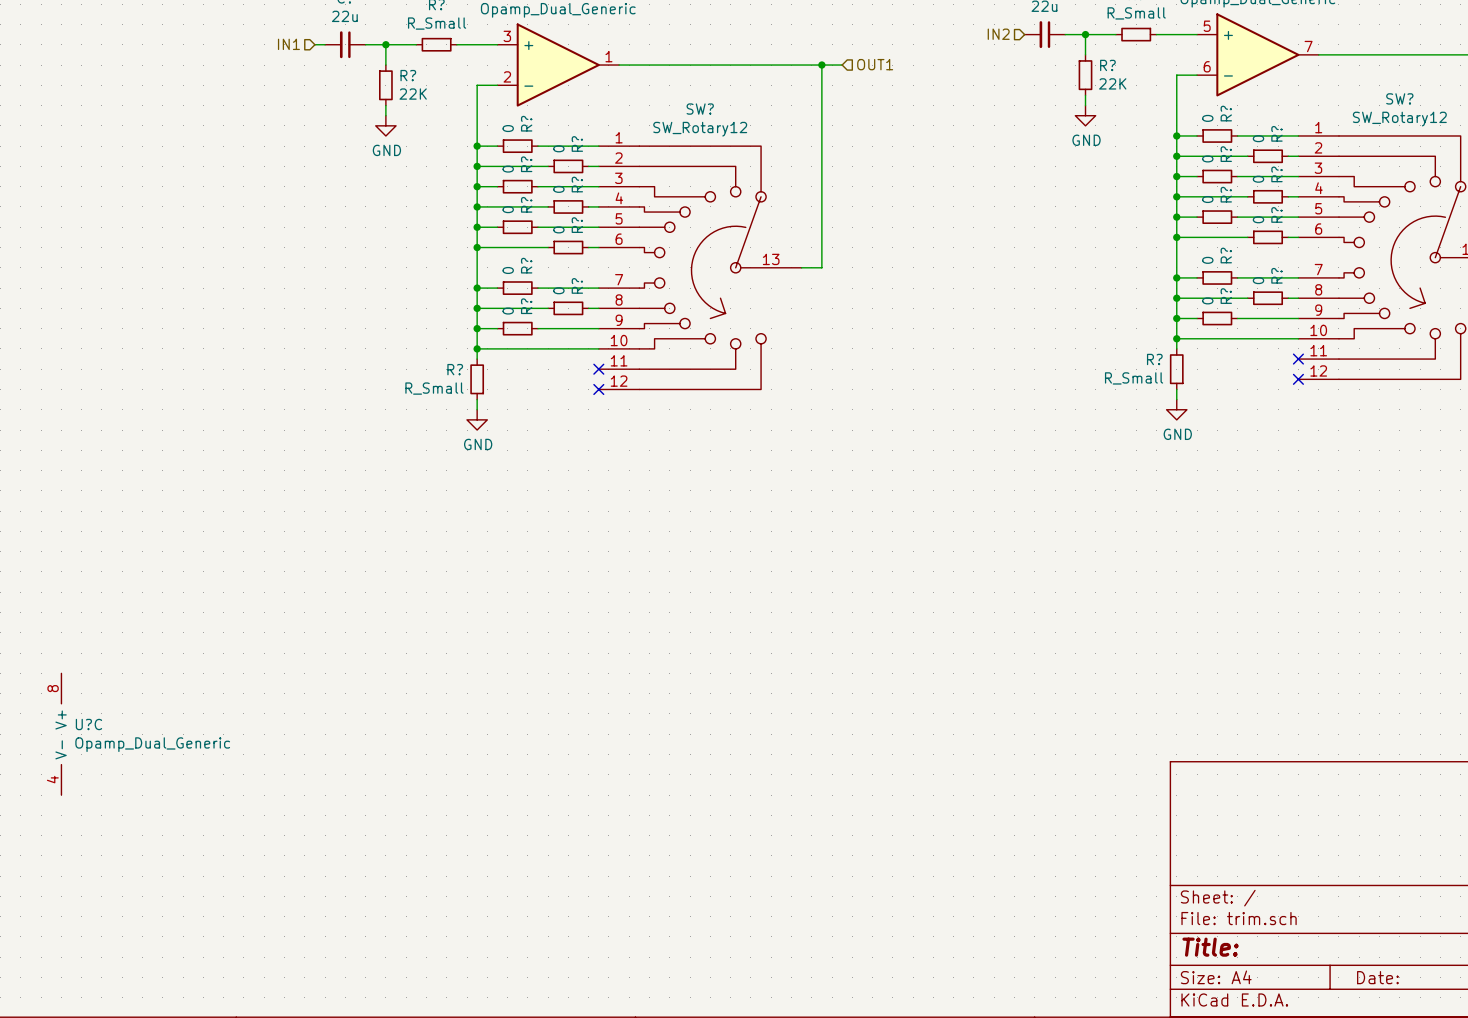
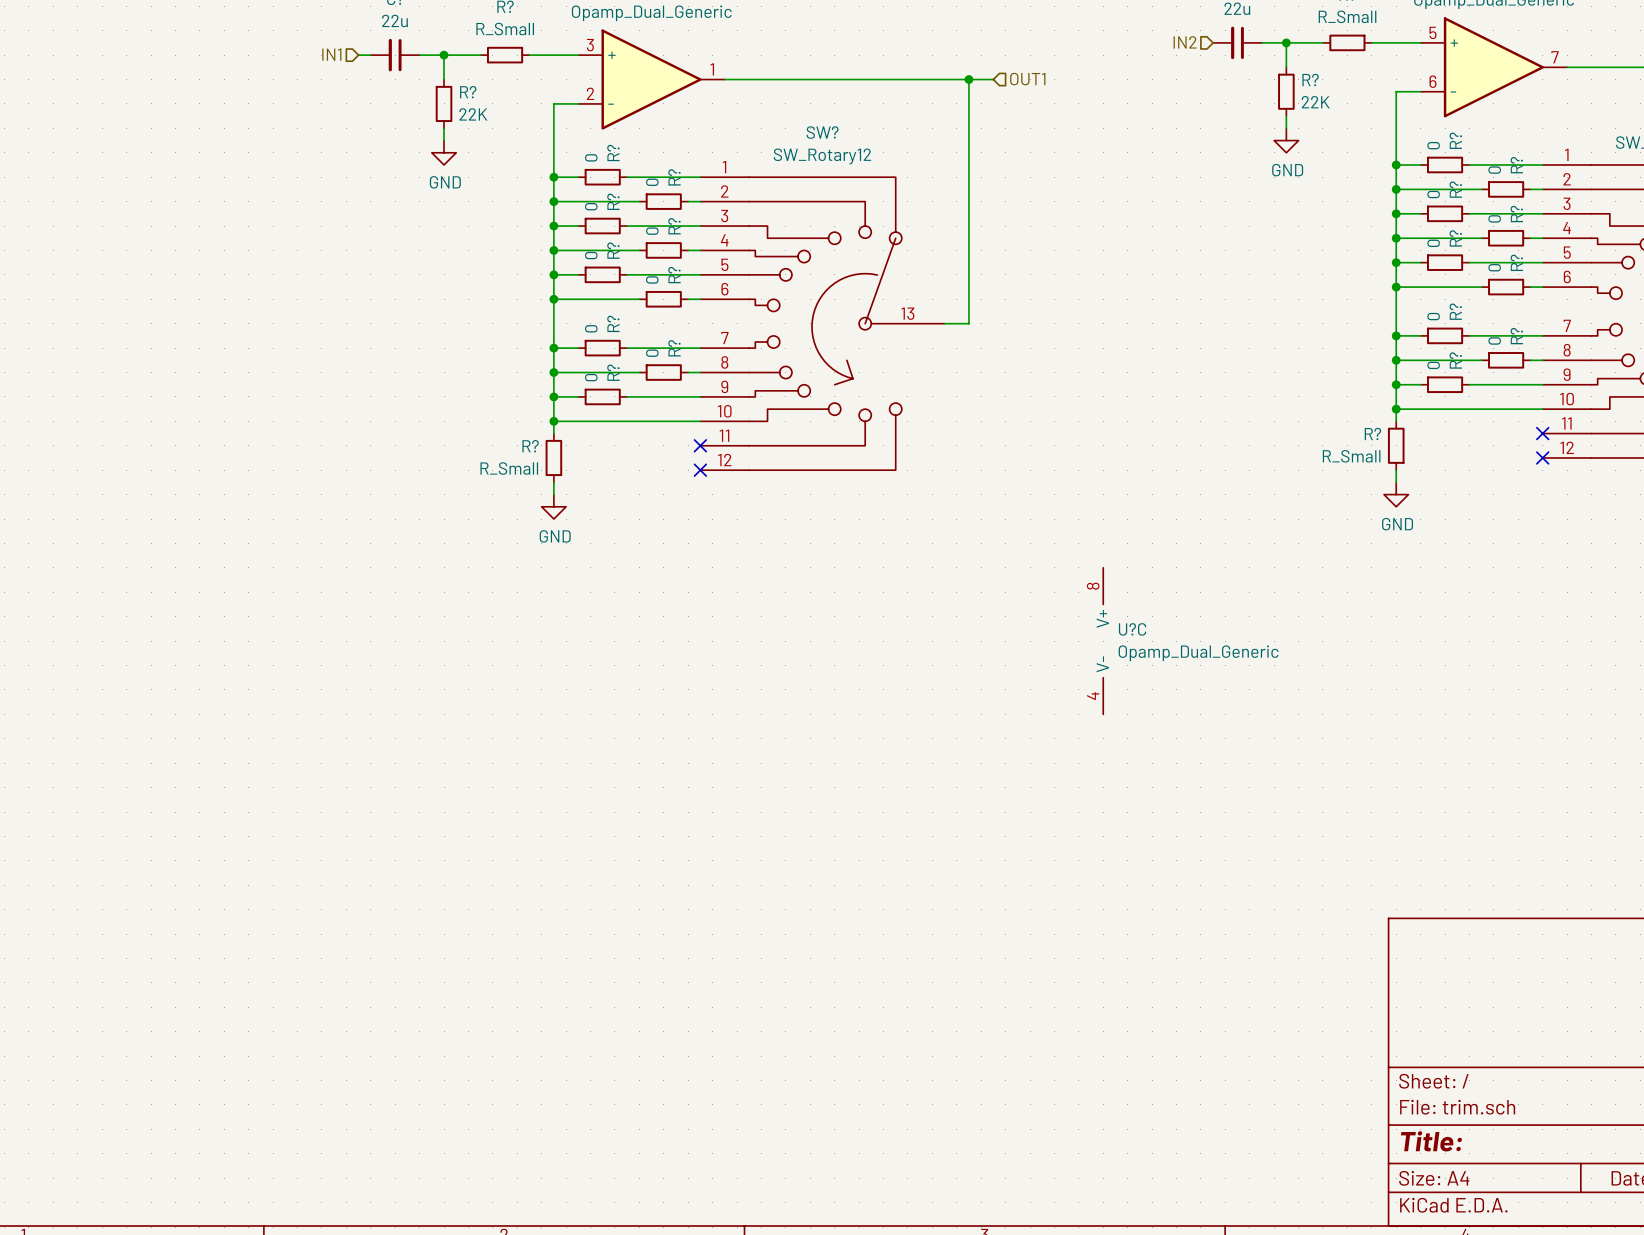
U?C: none -> Opamp_Dual_Generic (1103, 641)
U?C: Opamp_Dual_Generic (61, 734) -> none

